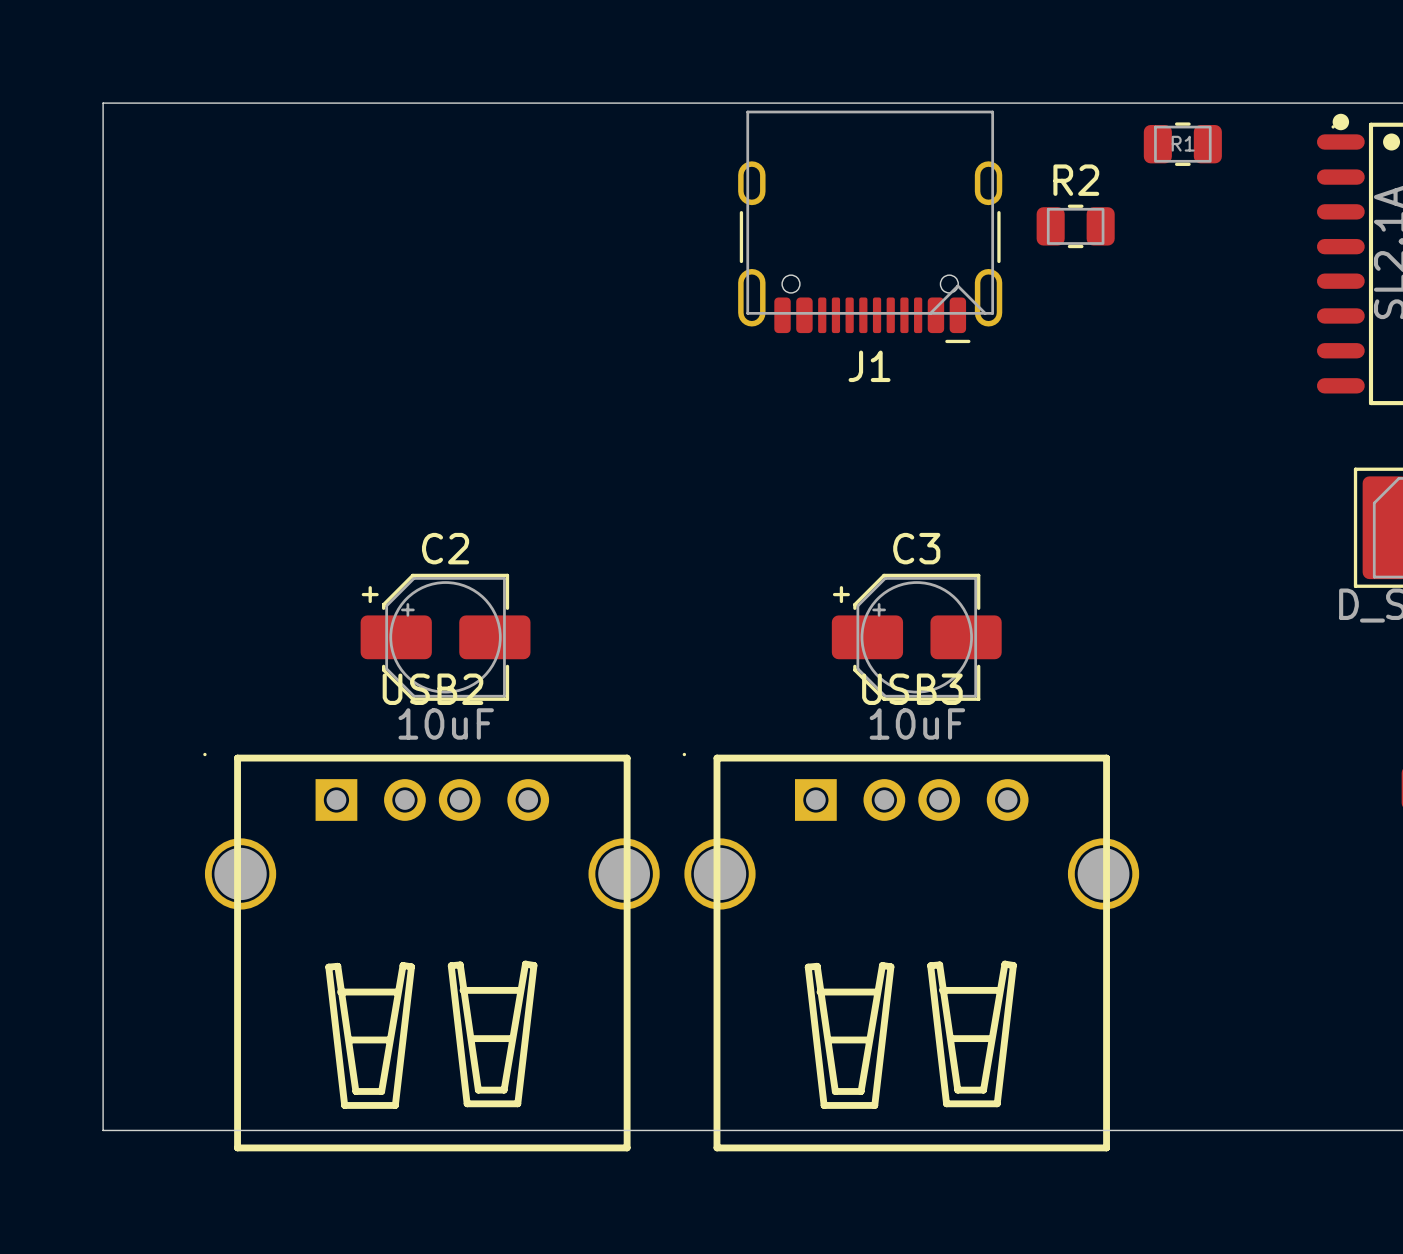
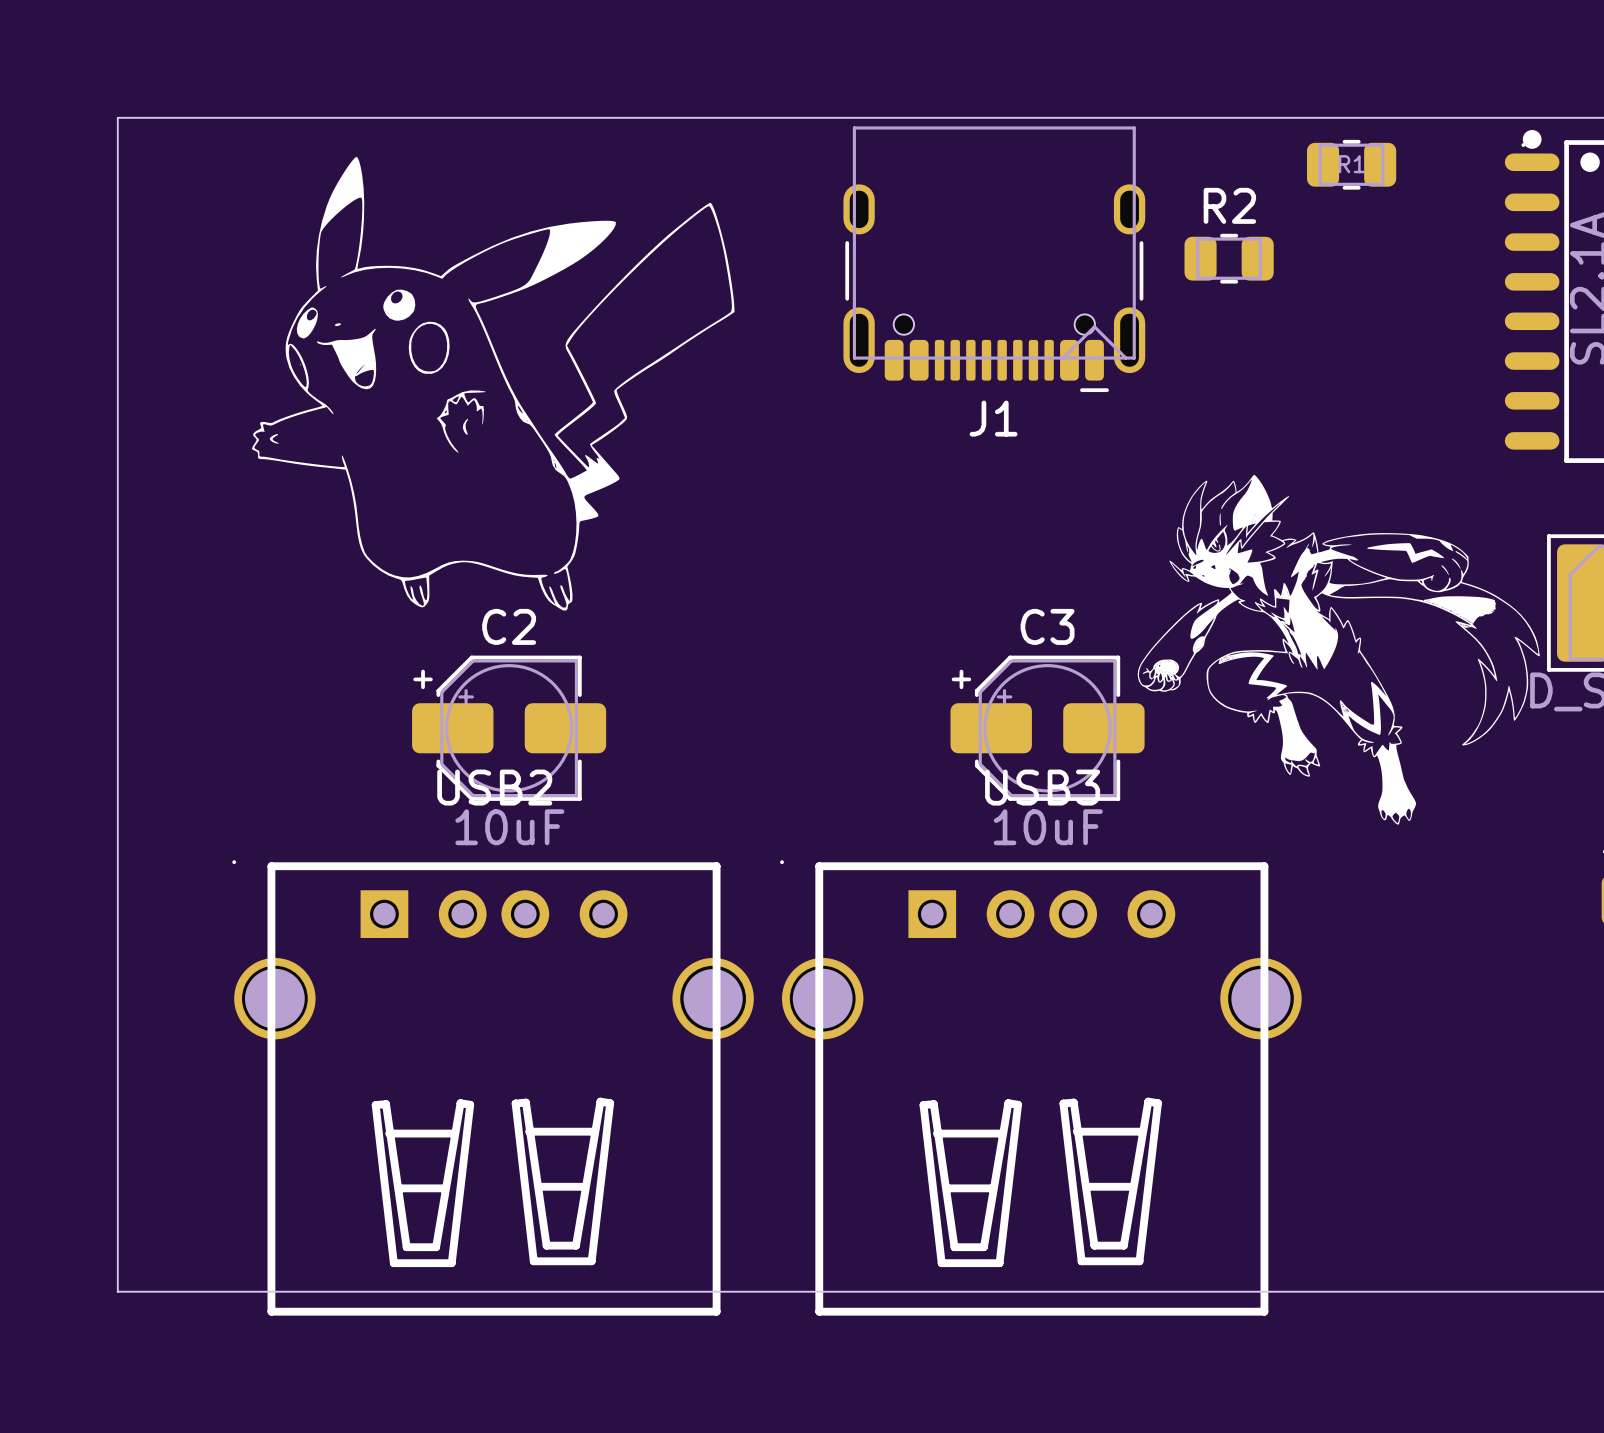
drawing: none -> [251, 156, 735, 611]
drawing: none -> [1137, 474, 1540, 825]

